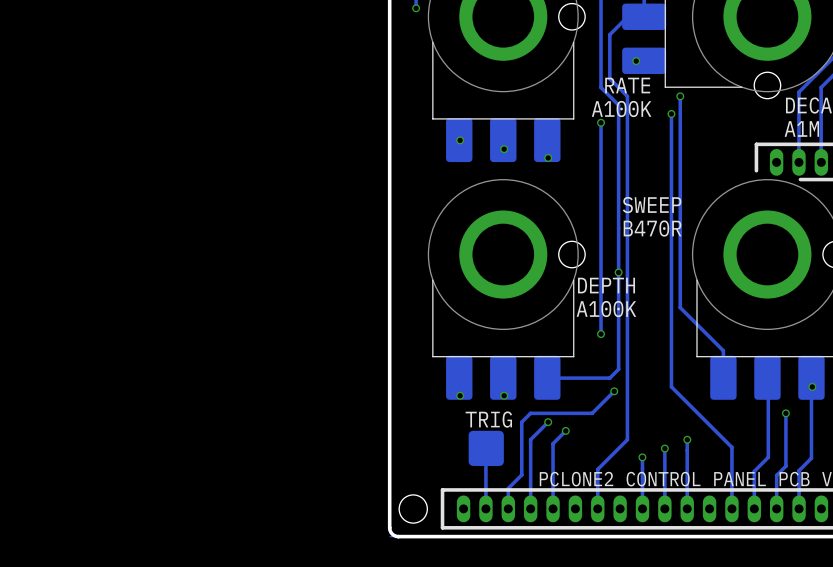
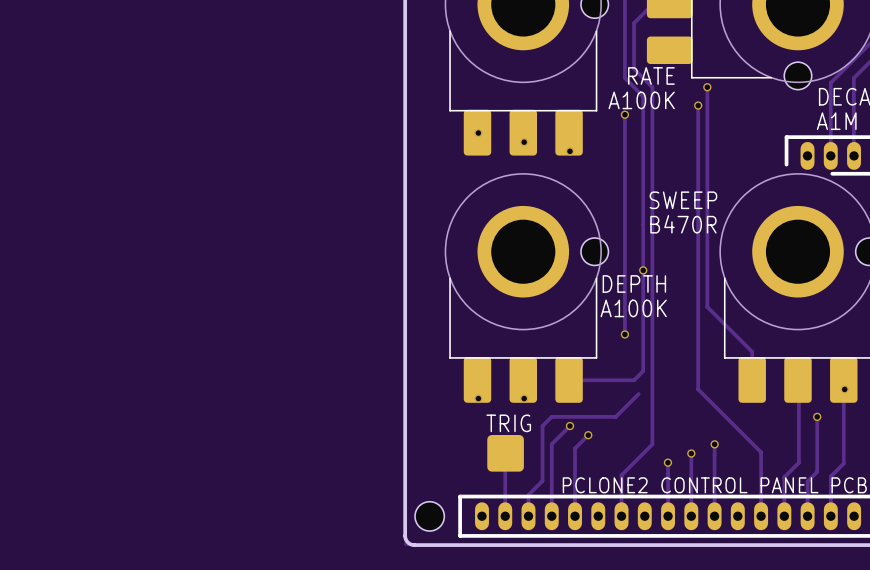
via: (636, 61) -> none
via: (614, 391) -> none

